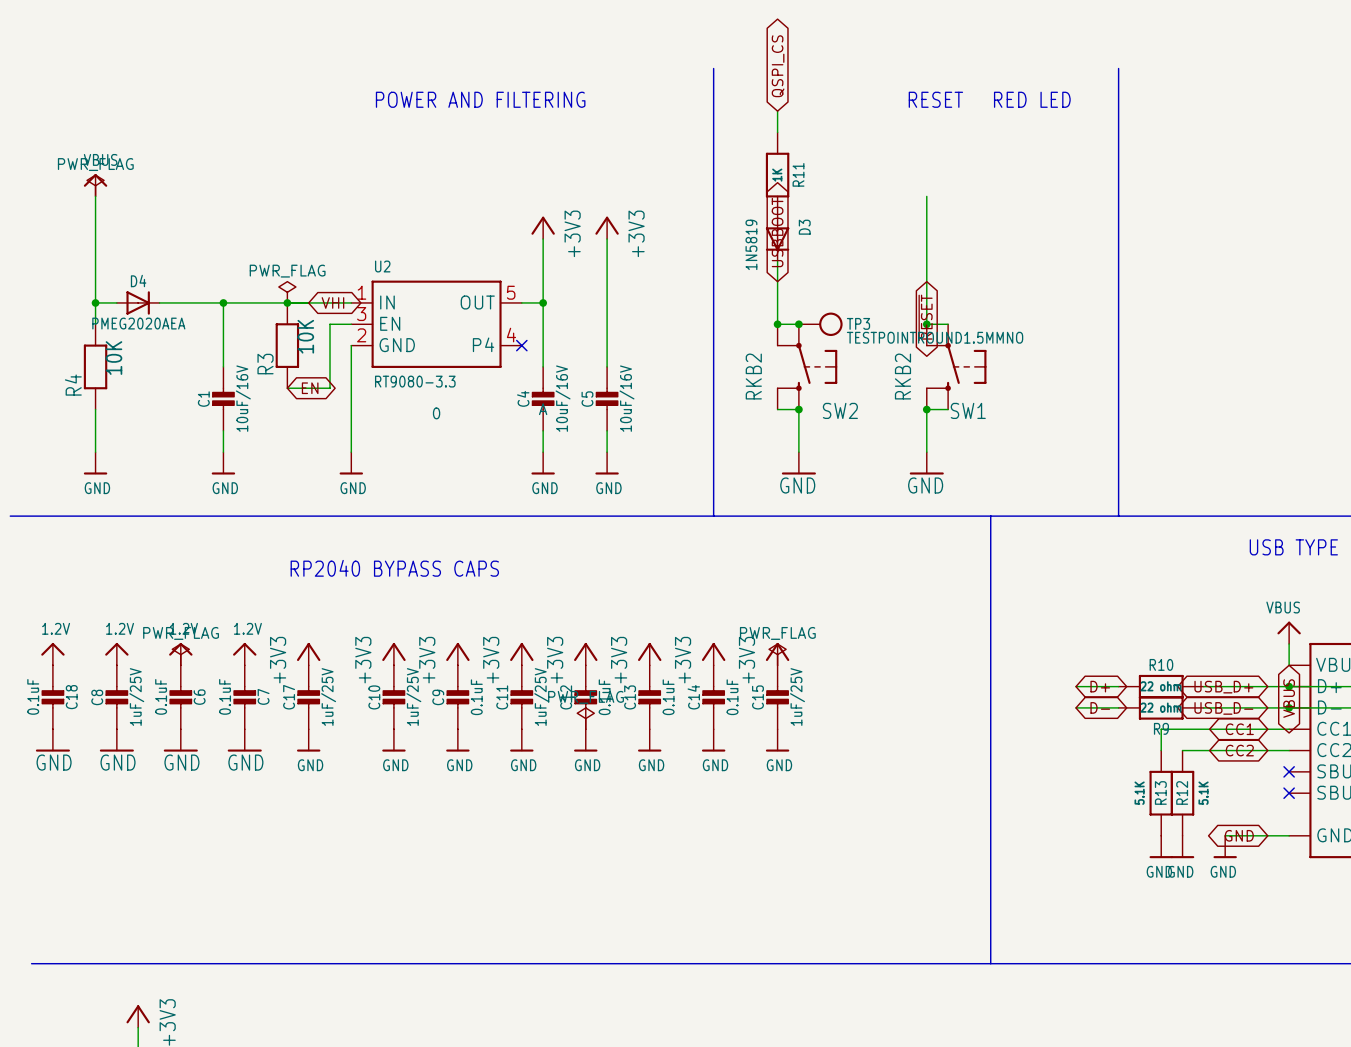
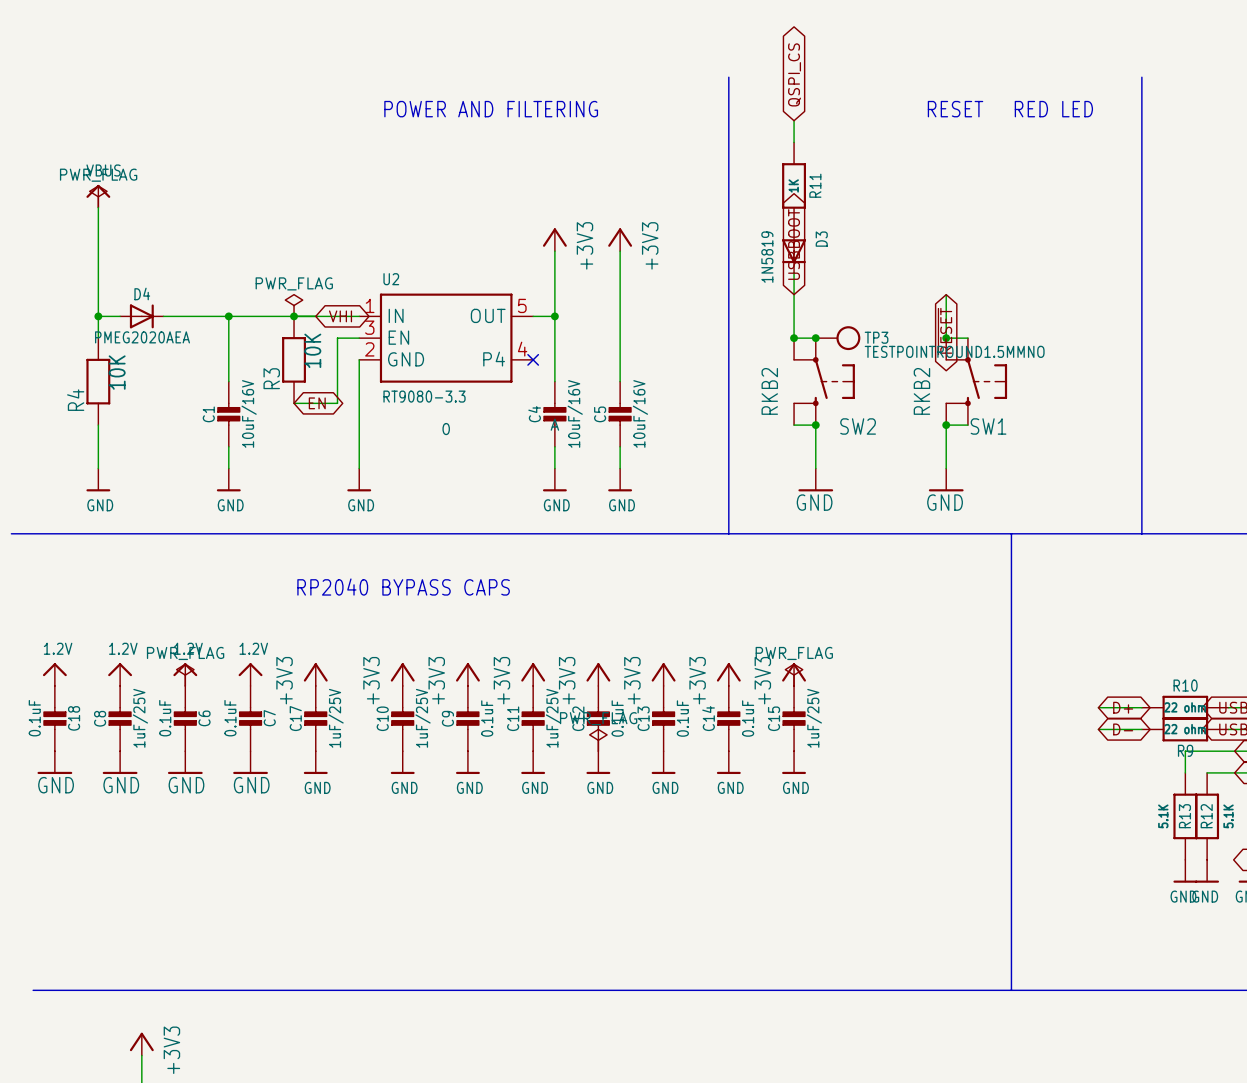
wire: (926, 196) (926, 281) -> none

